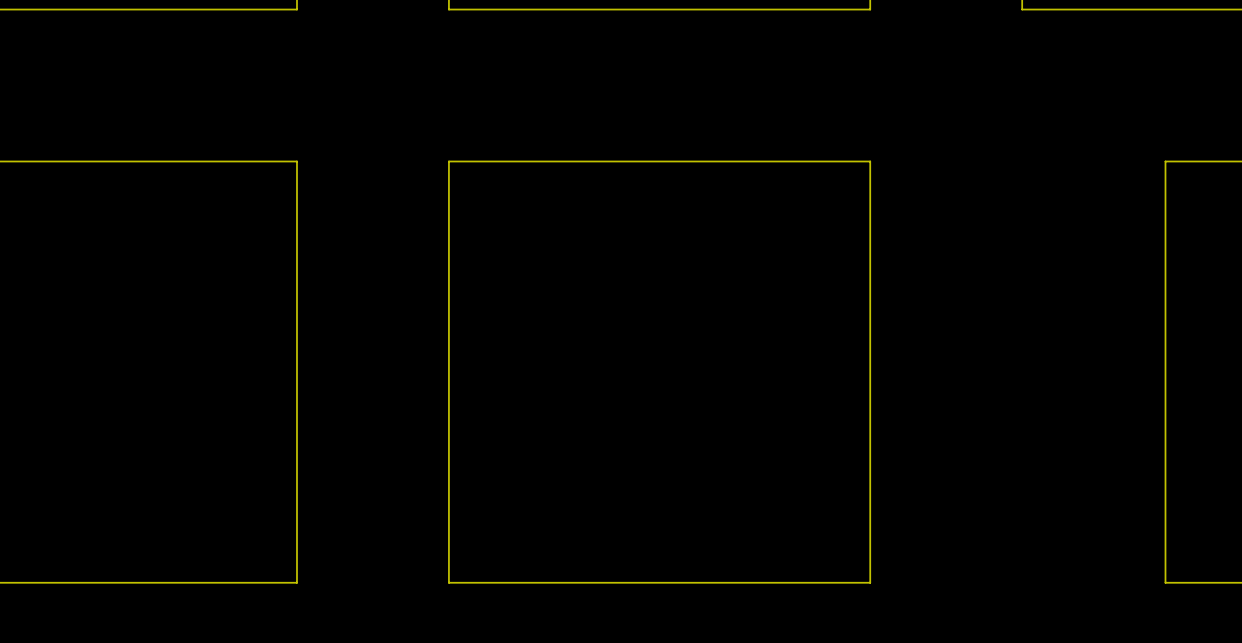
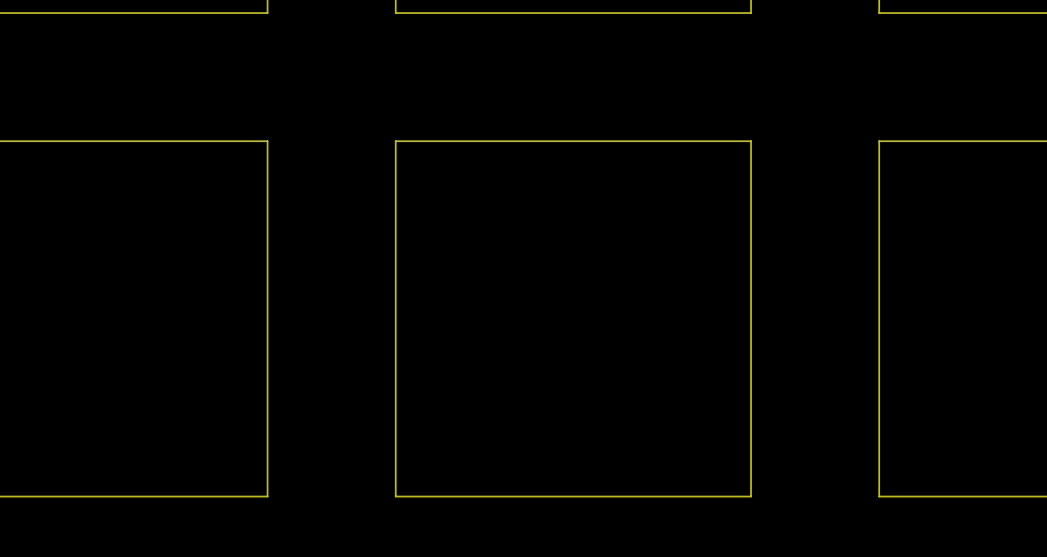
board edge: (1165, 161) (1165, 582) -> (1000, 141) (879, 141) (879, 496) (1000, 496)

